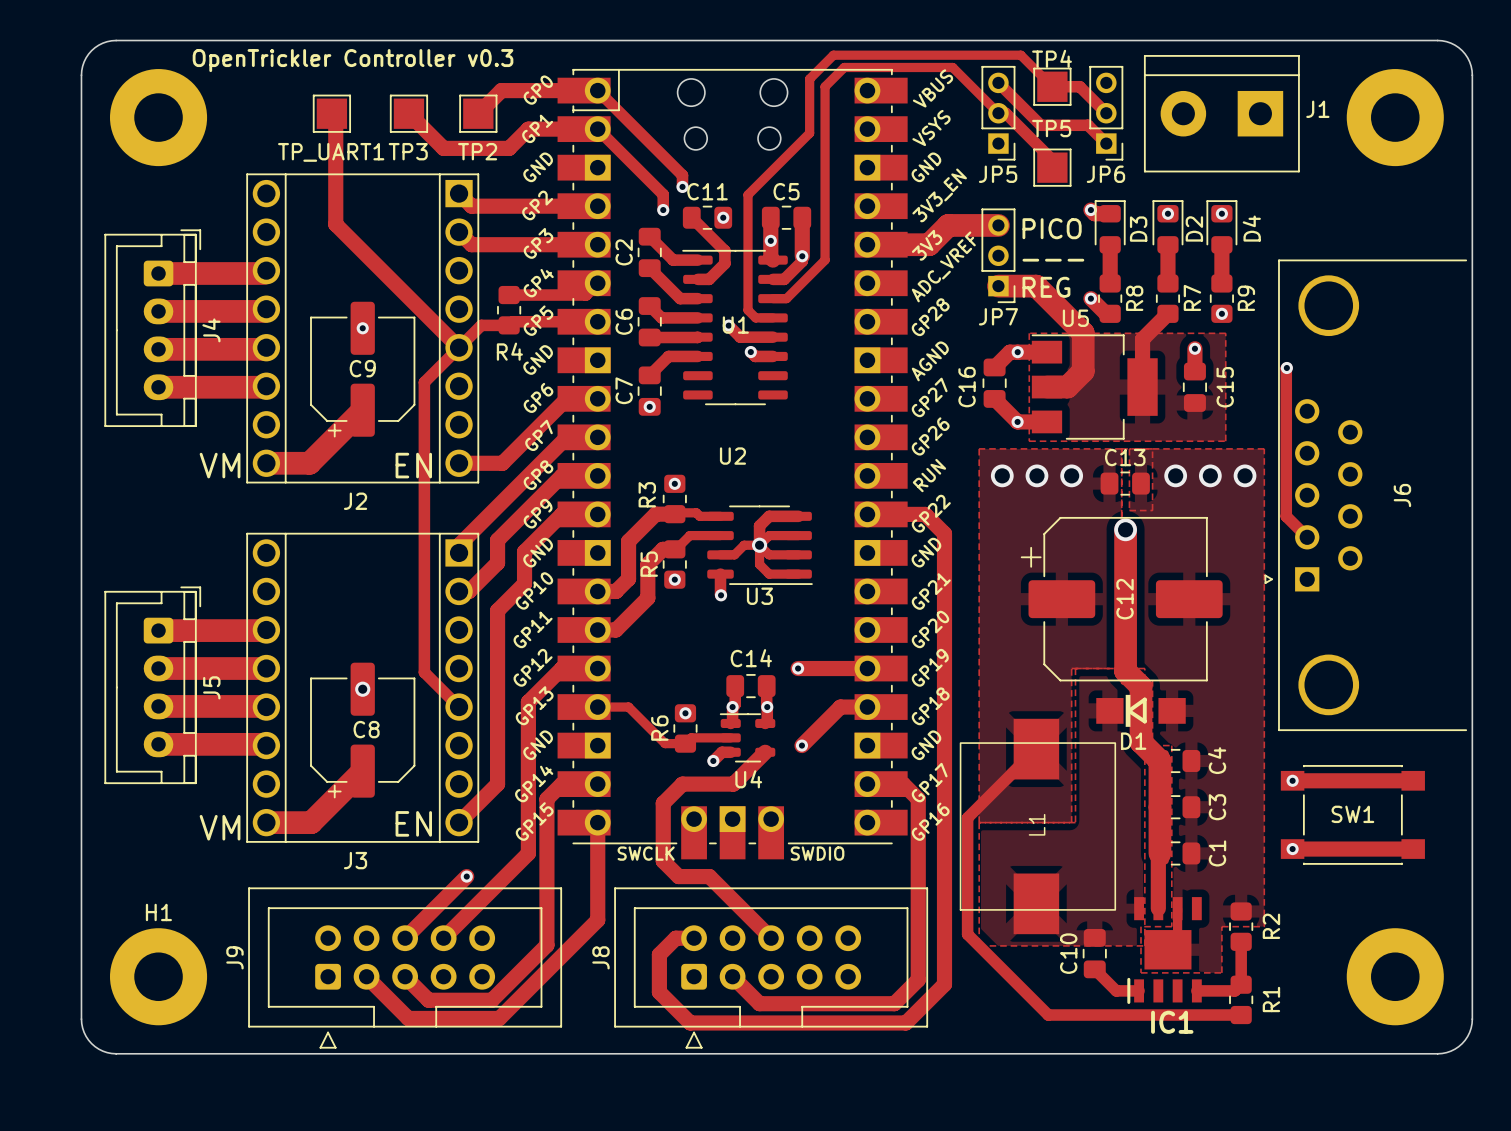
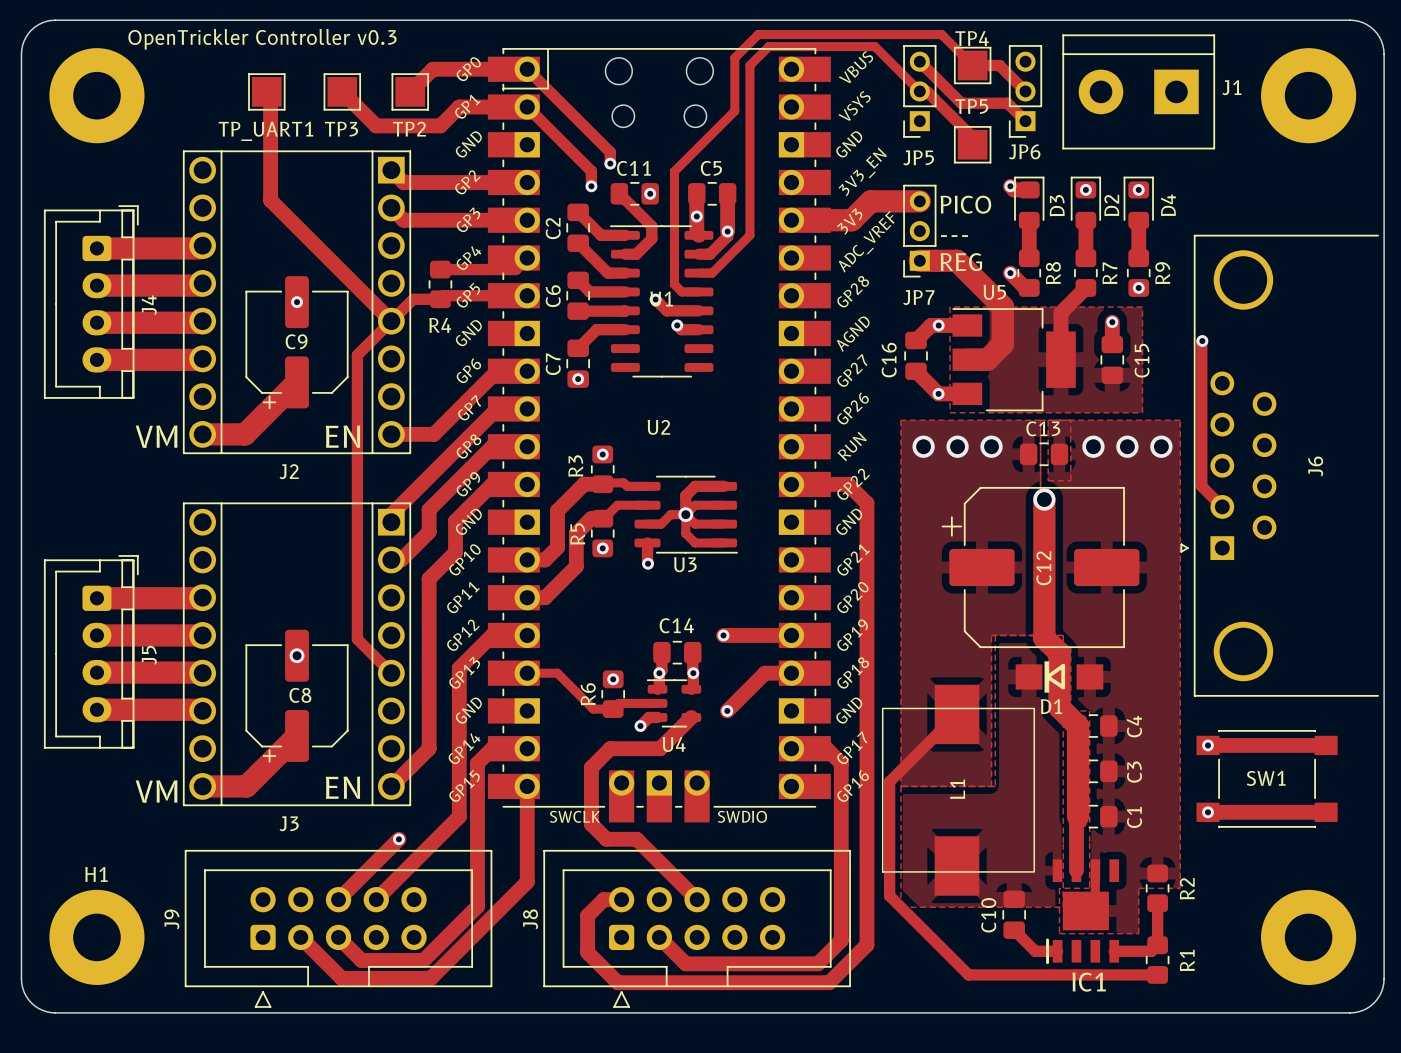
JP5 footprint: [981, 65, 1016, 161] -> [903, 45, 937, 138]
JP6 footprint: [1089, 65, 1124, 161] -> [1008, 45, 1043, 138]
JP7 footprint: [981, 208, 1016, 304] -> [903, 184, 937, 278]

